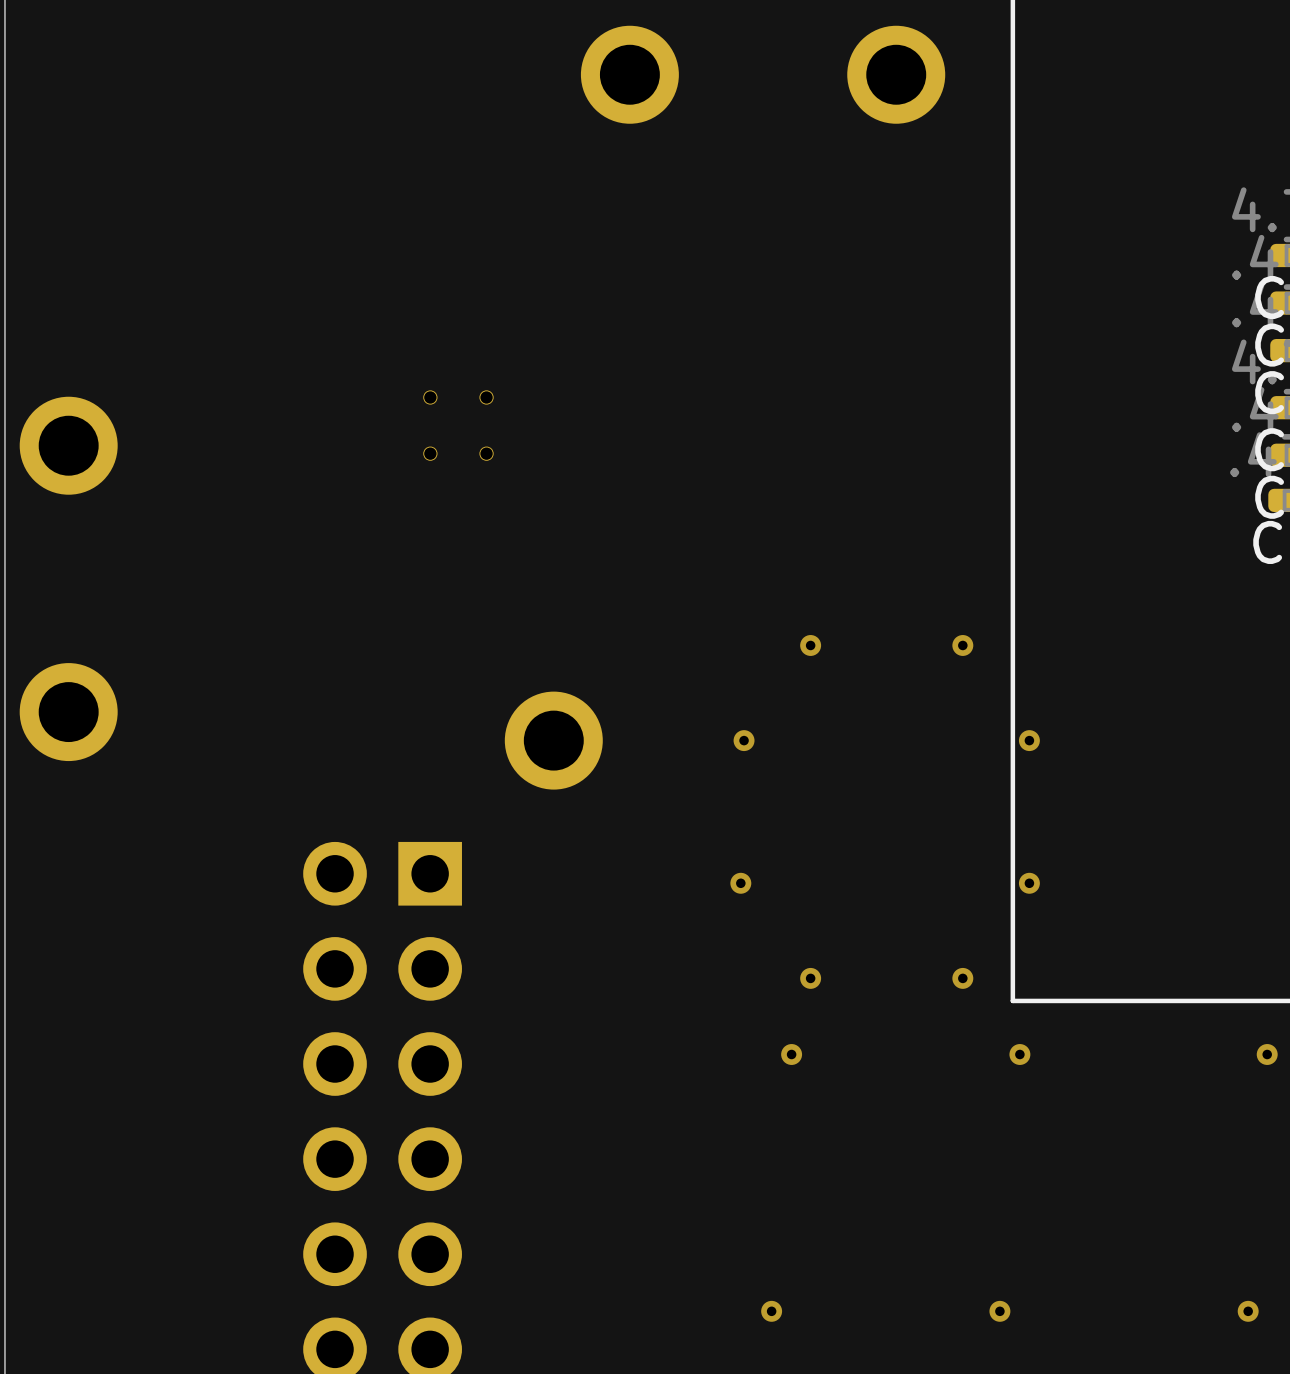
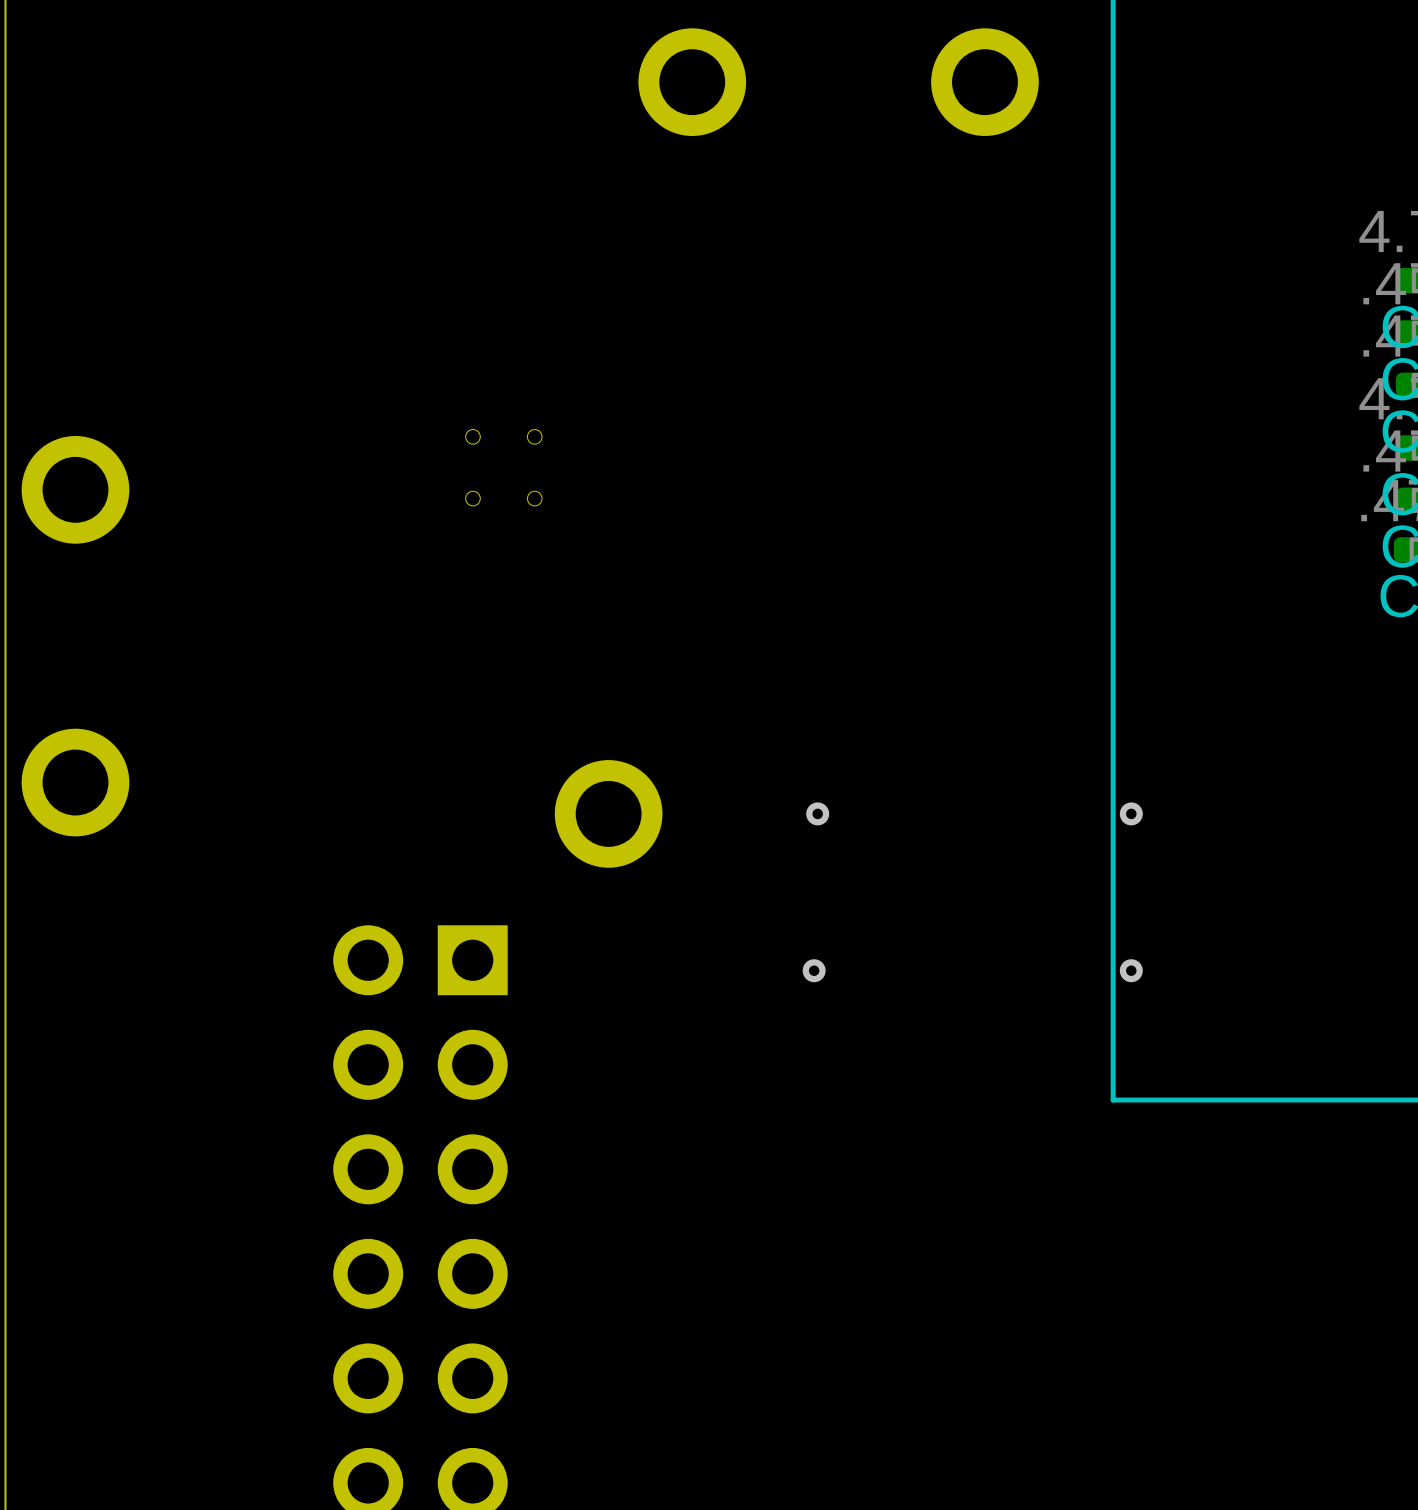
via: (810, 645) -> none
via: (962, 645) -> none
via: (810, 978) -> none
via: (962, 978) -> none
via: (791, 1054) -> none
via: (1019, 1054) -> none
via: (1267, 1054) -> none
via: (771, 1311) -> none
via: (999, 1311) -> none
via: (1248, 1311) -> none

